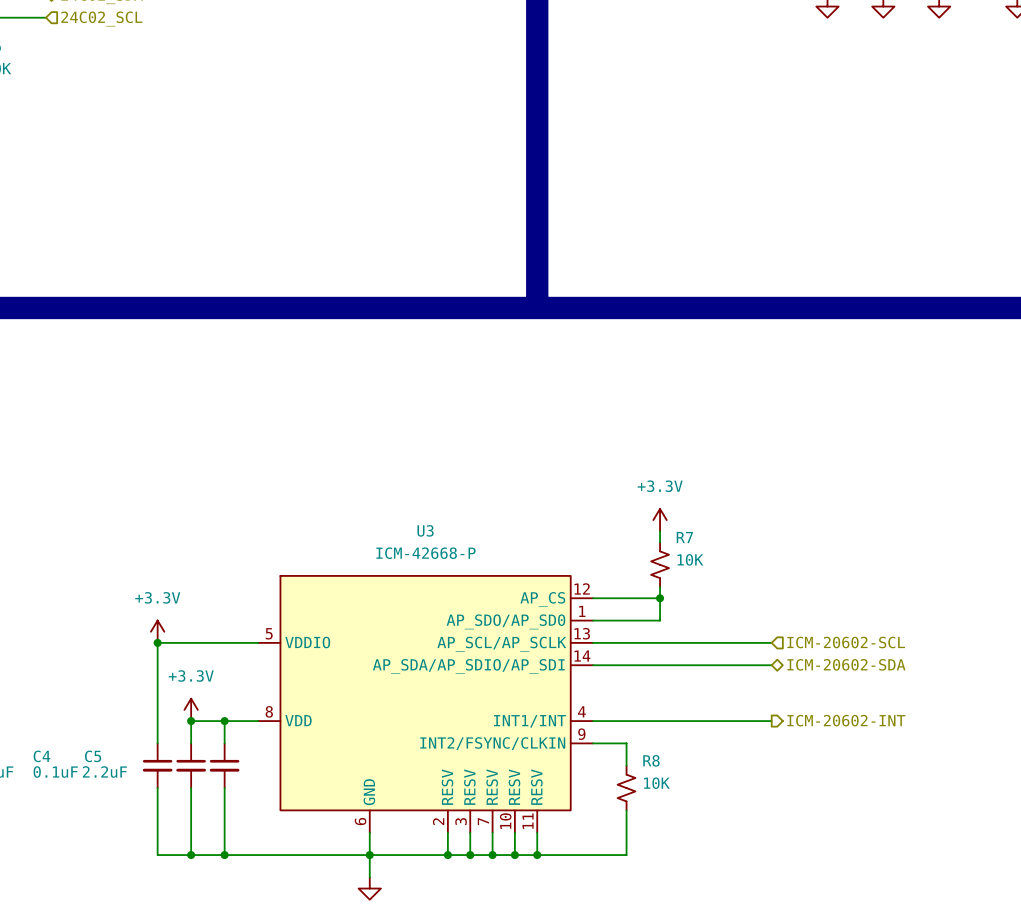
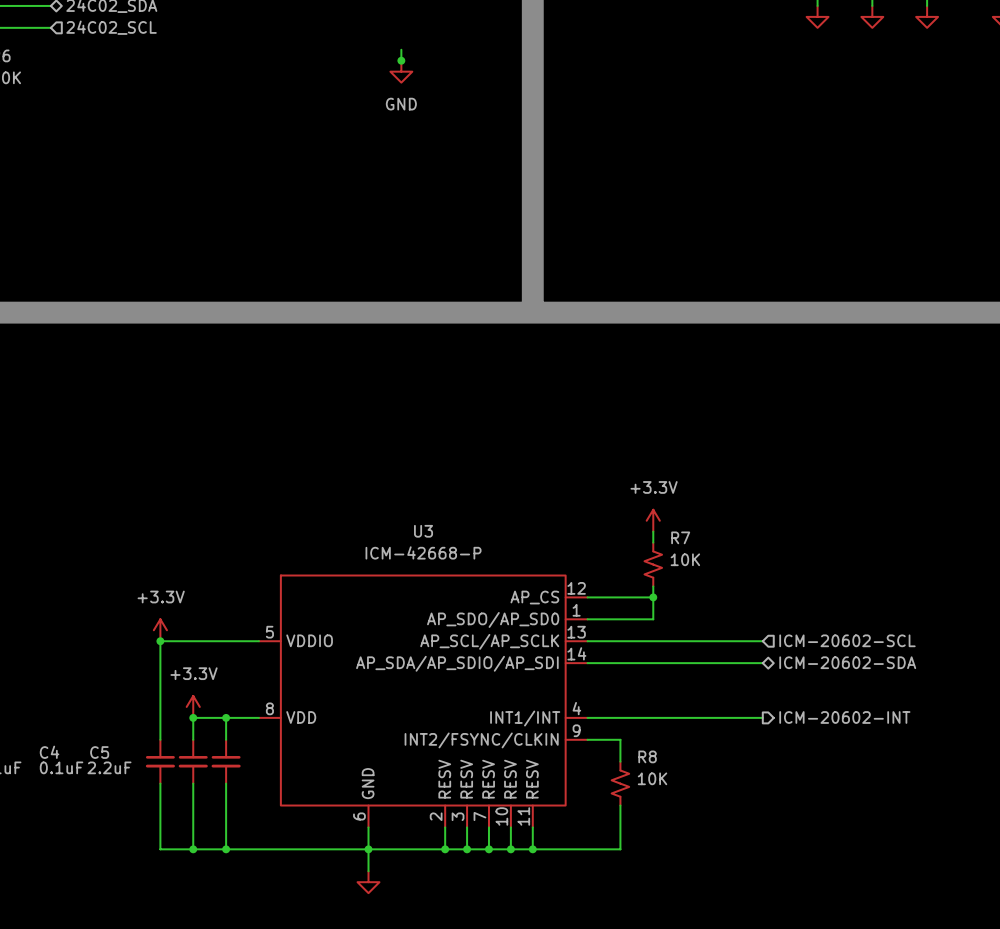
wire: none -> (401, 49) (401, 60)
junction: none -> (401, 60)
power symbol: none -> GND (401, 71)

